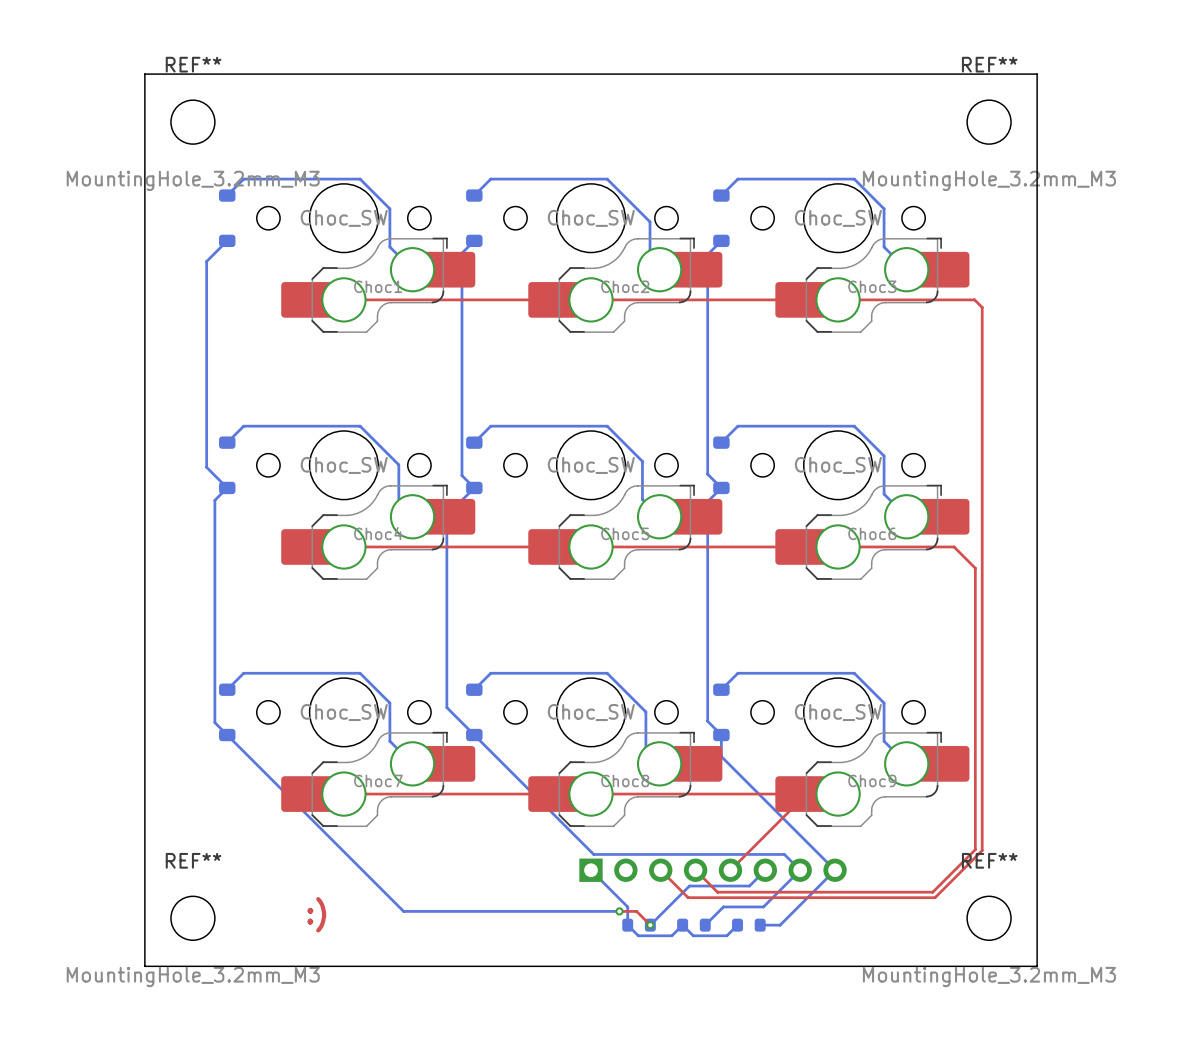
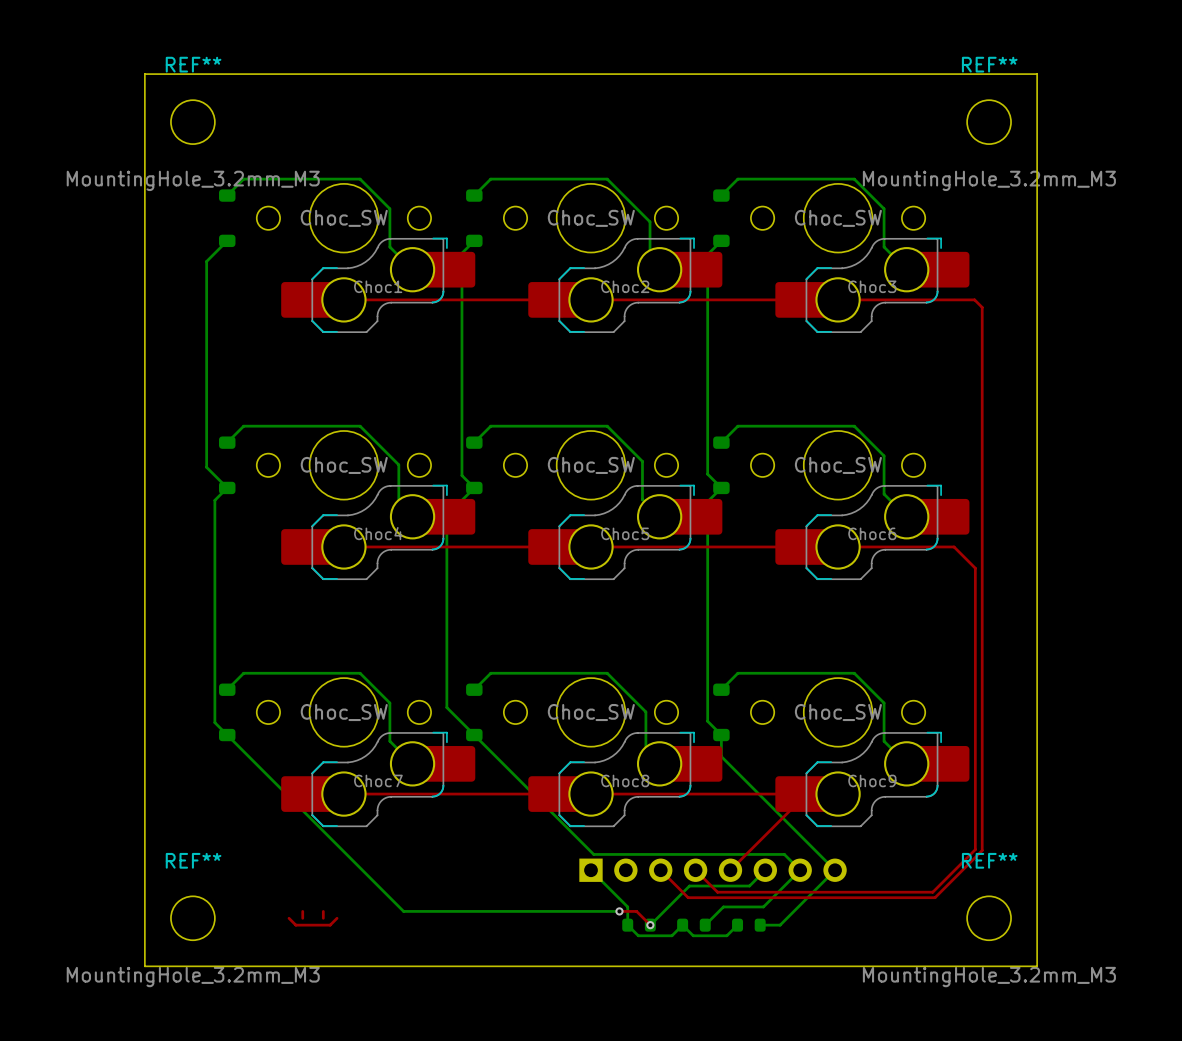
top track: none -> (302, 911) (302, 918)
top track: none -> (323, 911) (323, 918)
text: :) (316, 914) -> none
top track: none -> (289, 918) (295, 925) (330, 925) (337, 918)

